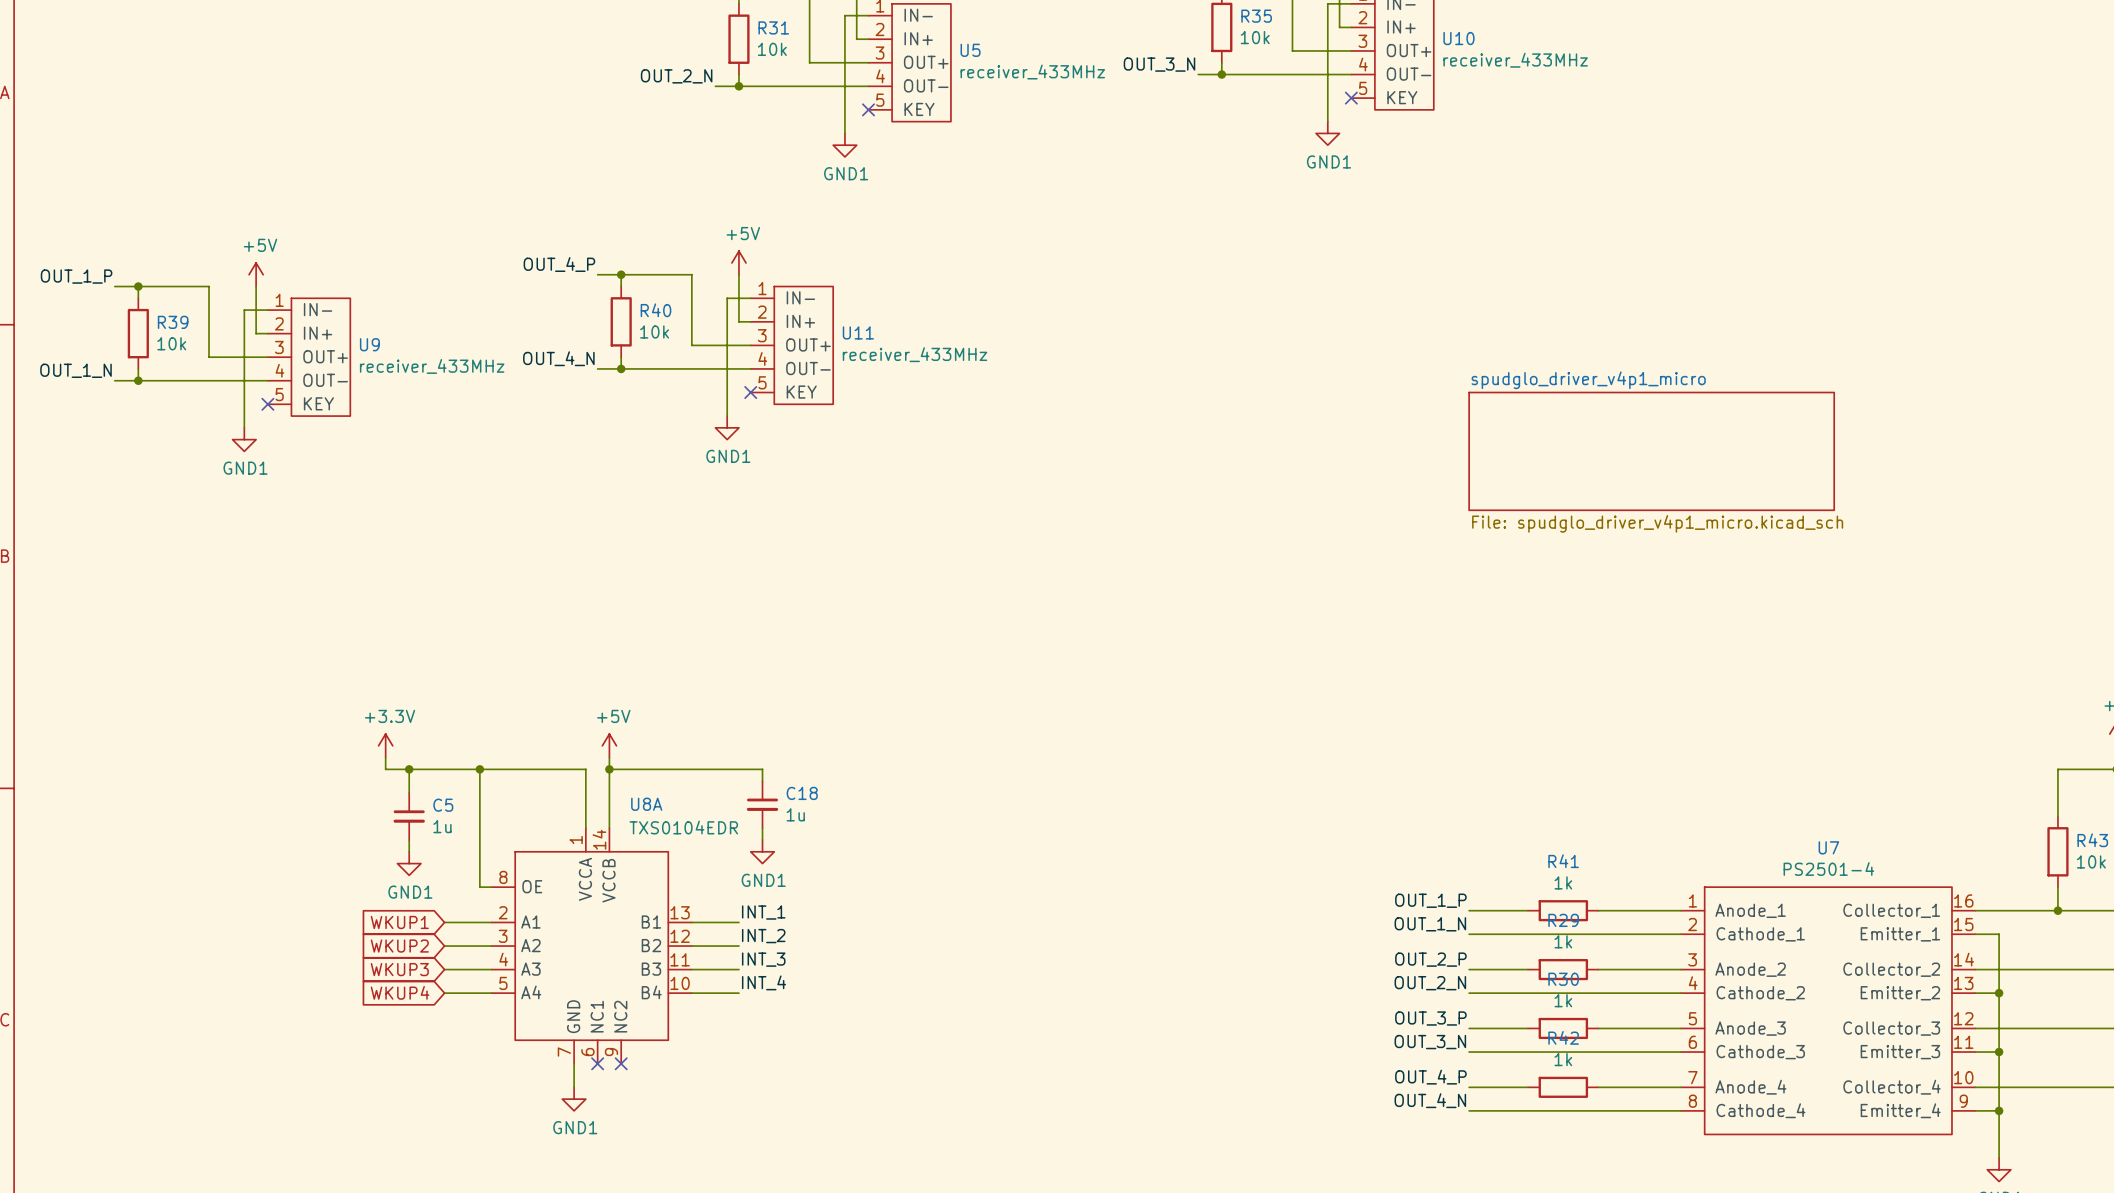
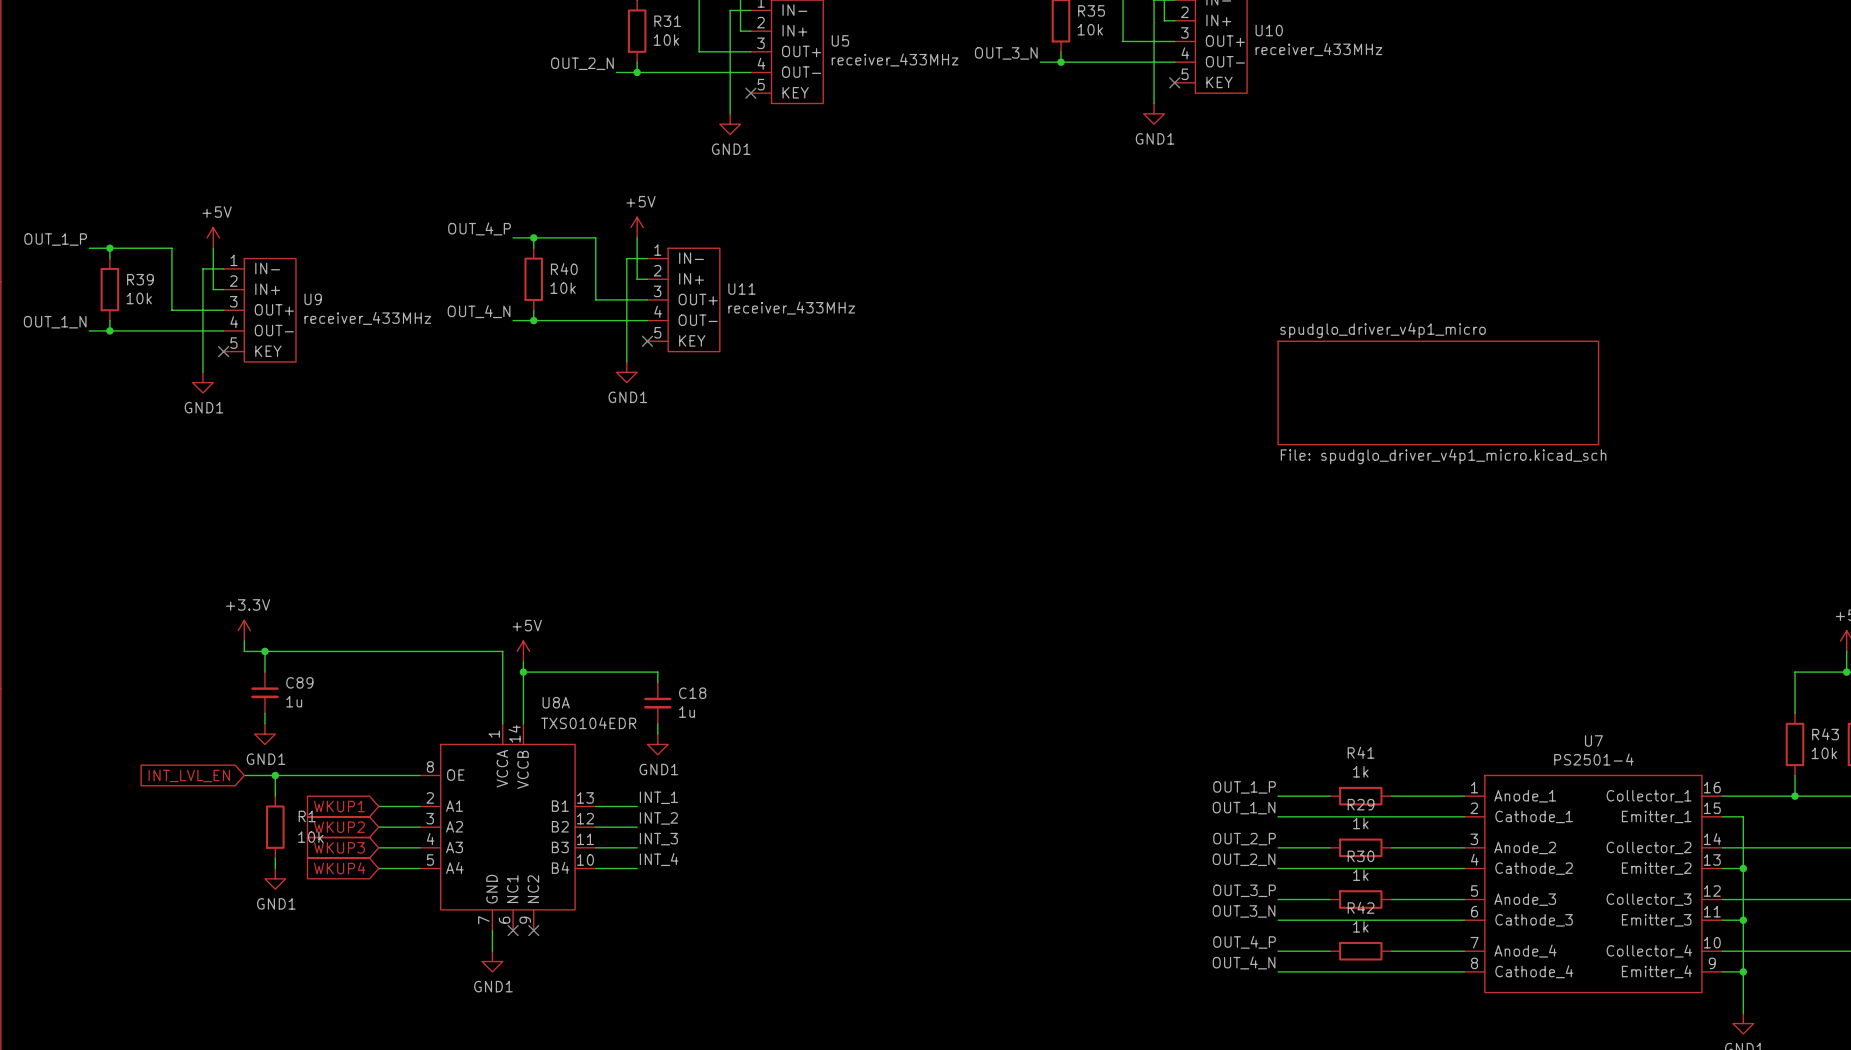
junction: none -> (264, 651)
power symbol position: +3.3V (385, 745) -> +3.3V (244, 630)
wire: (385, 757) (385, 769) (585, 769) -> (244, 641) (244, 651) (502, 651) (502, 672)
wire: (409, 769) (409, 792) -> (264, 651) (264, 672)
junction: (409, 769) -> none
wire: (479, 769) (479, 887) -> (244, 775) (409, 775)
junction: (479, 769) -> none
C89: none -> 1u (264, 692)
C5: 1u (409, 816) -> none
power symbol: none -> GND1 (264, 734)
wire: (409, 840) (409, 851) -> (264, 713) (264, 723)
power symbol: GND1 (409, 863) -> none
global label: none -> INT_LVL_EN (189, 775)
wire: none -> (275, 775) (275, 796)
junction: none -> (275, 775)
R1: none -> 10k (275, 827)
wire: none -> (275, 858) (275, 868)
power symbol: none -> GND1 (275, 878)

